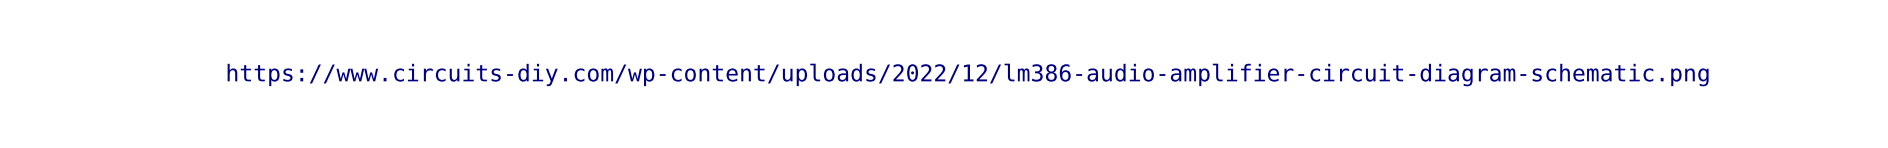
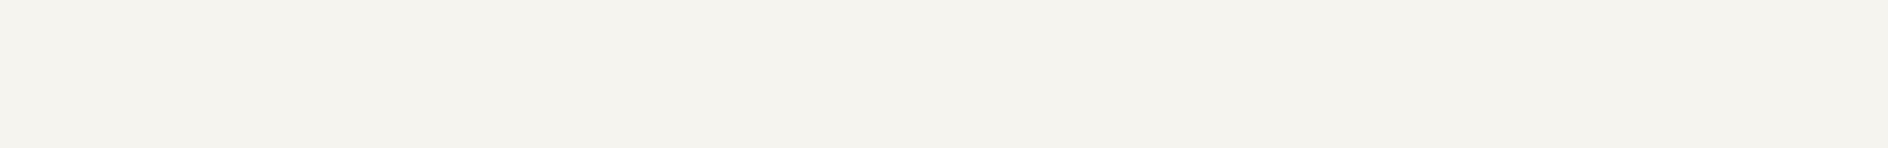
text: https://www.circuits-diy.com/wp-content/uploads/2022/12/lm386-audio-amplifier-circuit-diagram-schematic.png (968, 74) -> none

